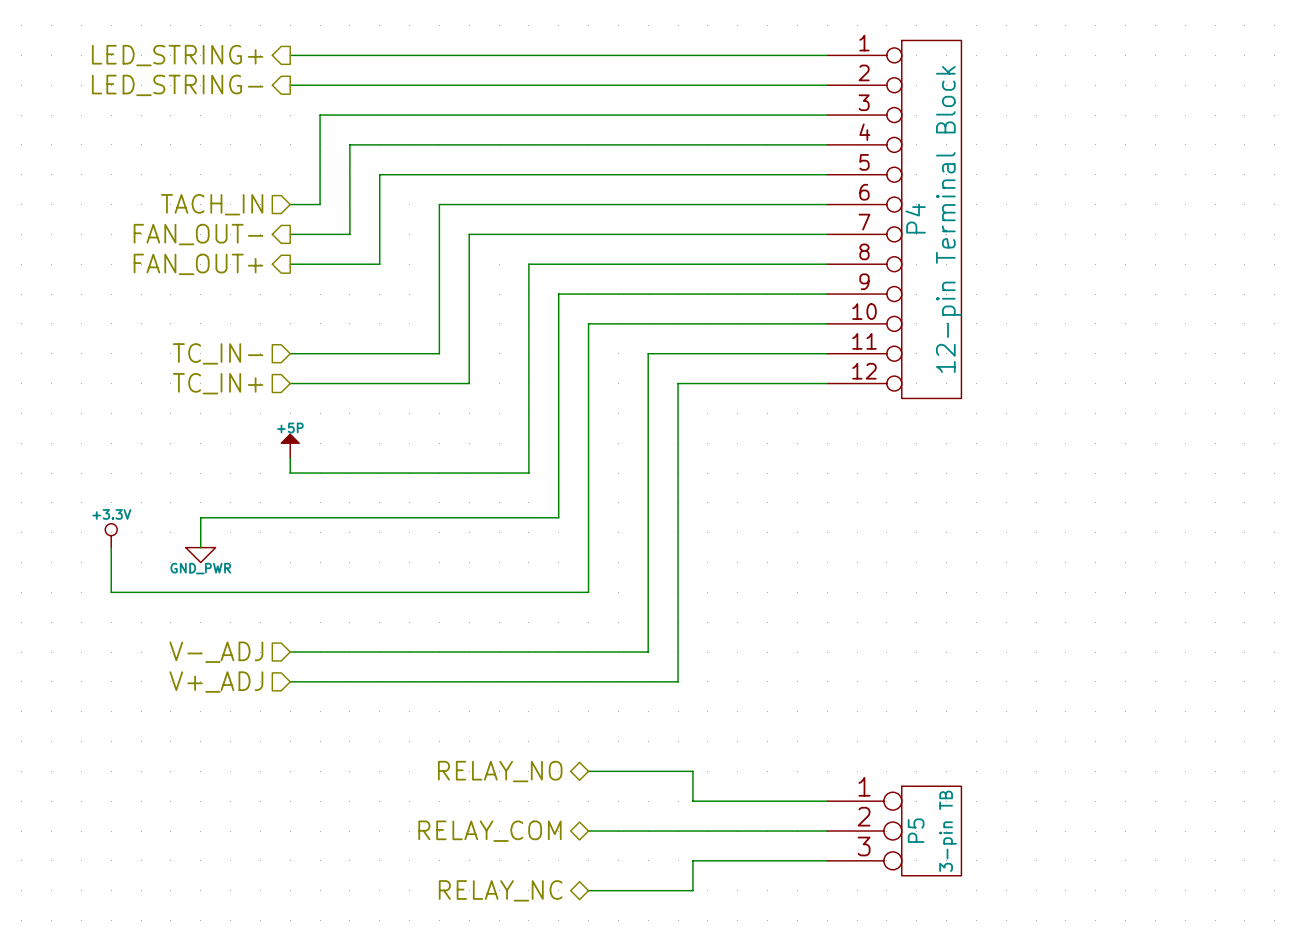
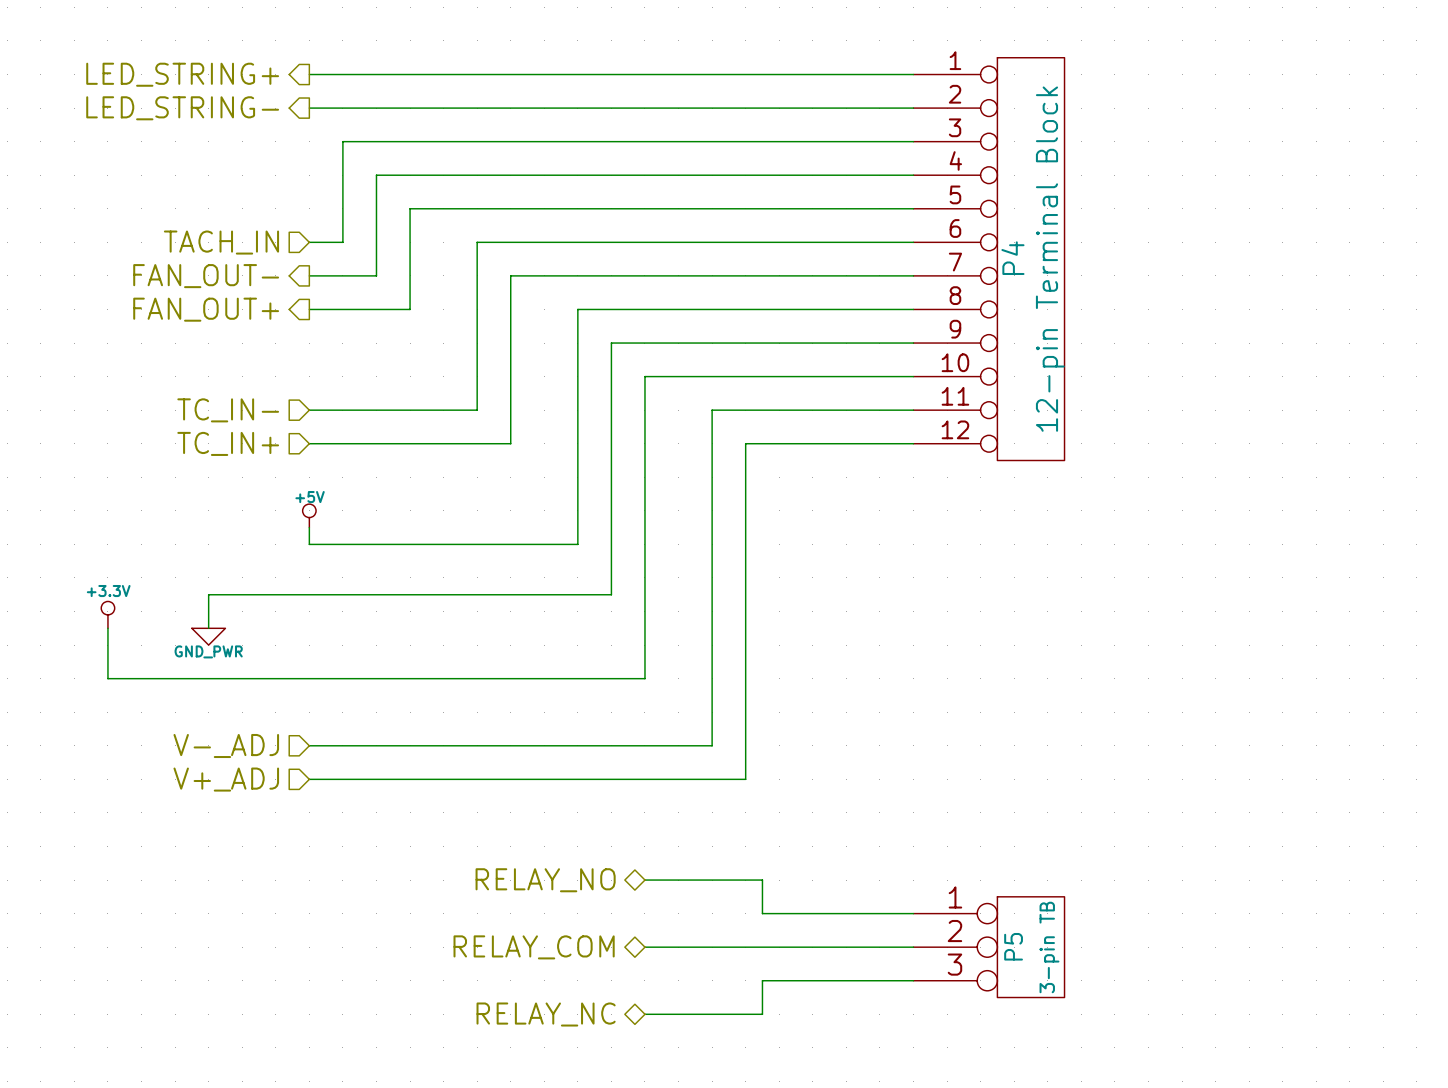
power symbol: +5P (290, 446) -> +5V (309, 515)

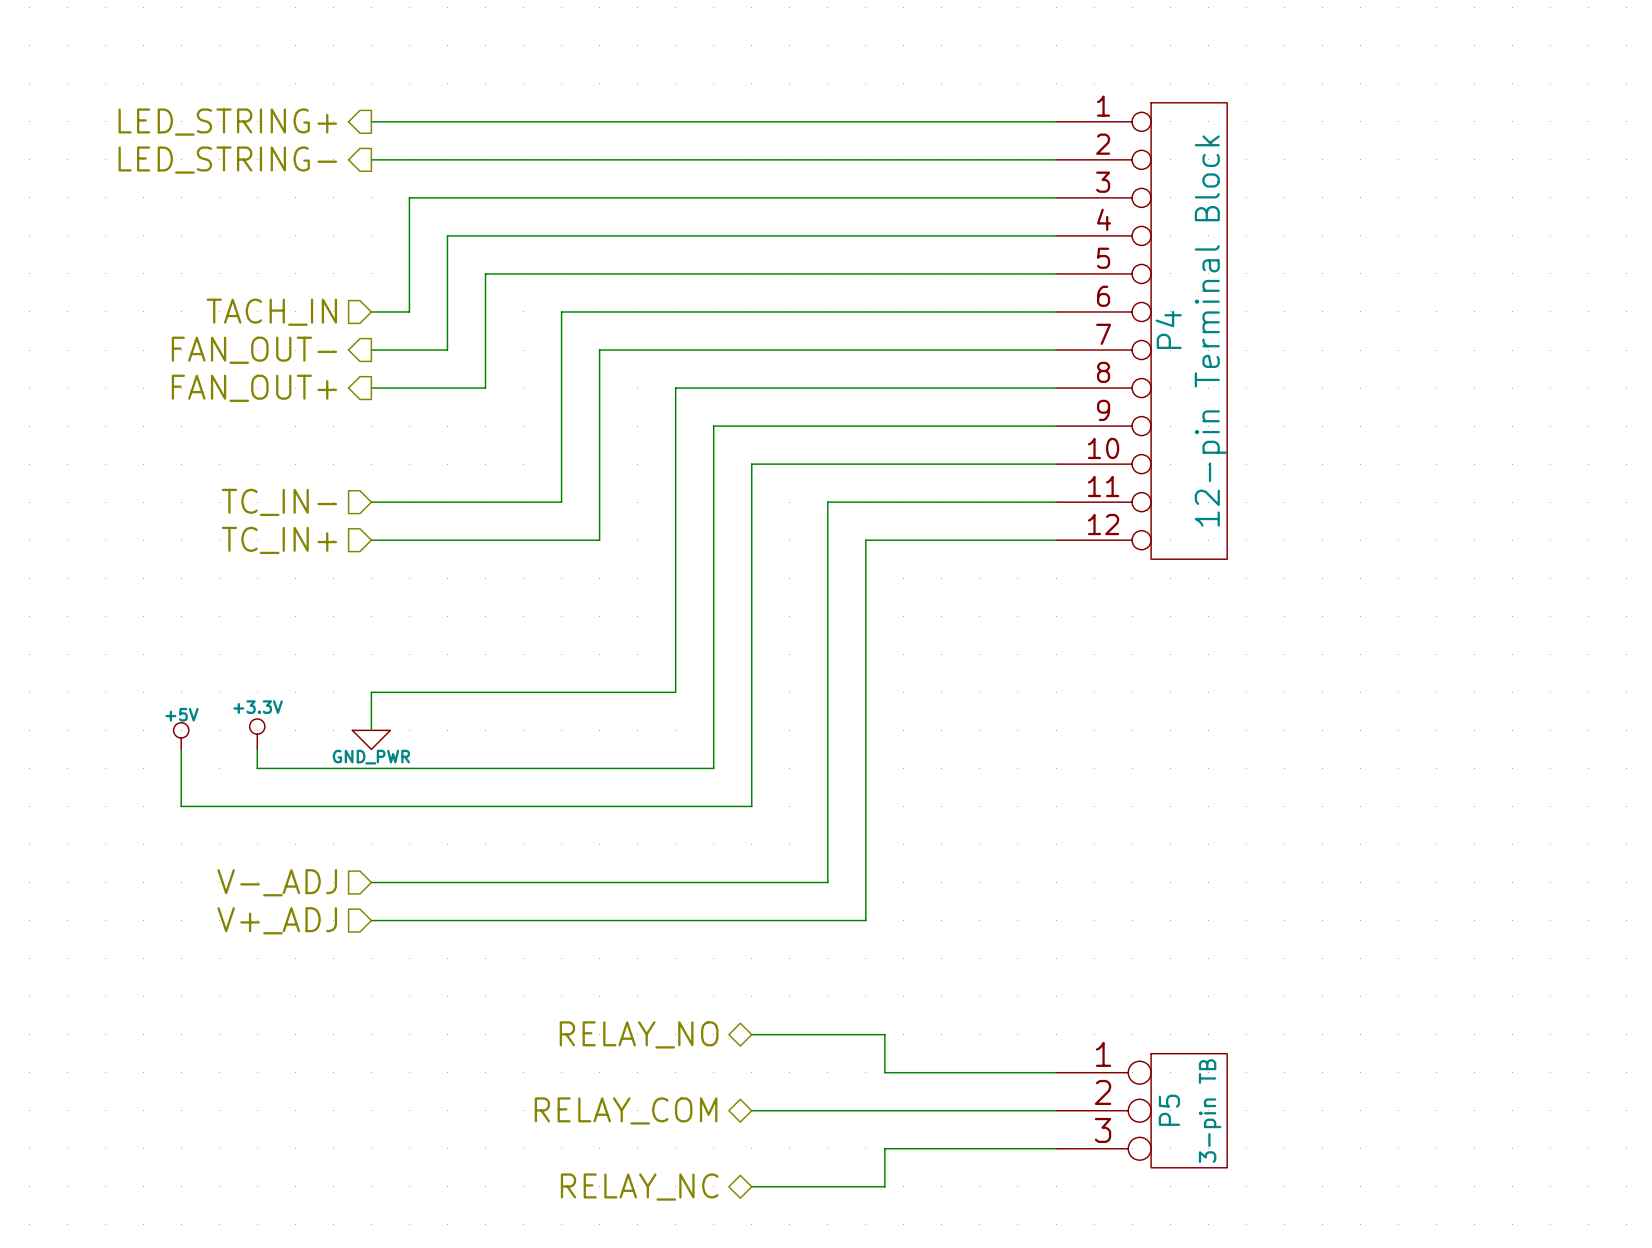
power symbol position: +5V (309, 515) -> +5V (181, 736)
wire: (309, 527) (309, 544) (577, 544) -> (371, 730) (371, 692) (675, 692) (675, 654)
wire: (611, 594) (208, 594) (208, 628) -> (713, 711) (713, 768) (257, 768) (257, 749)
power symbol position: +3.3V (107, 614) -> +3.3V (257, 734)
wire: (107, 628) (107, 678) (141, 678) -> (181, 749) (181, 806)
power symbol position: GND_PWR (208, 636) -> GND_PWR (371, 739)

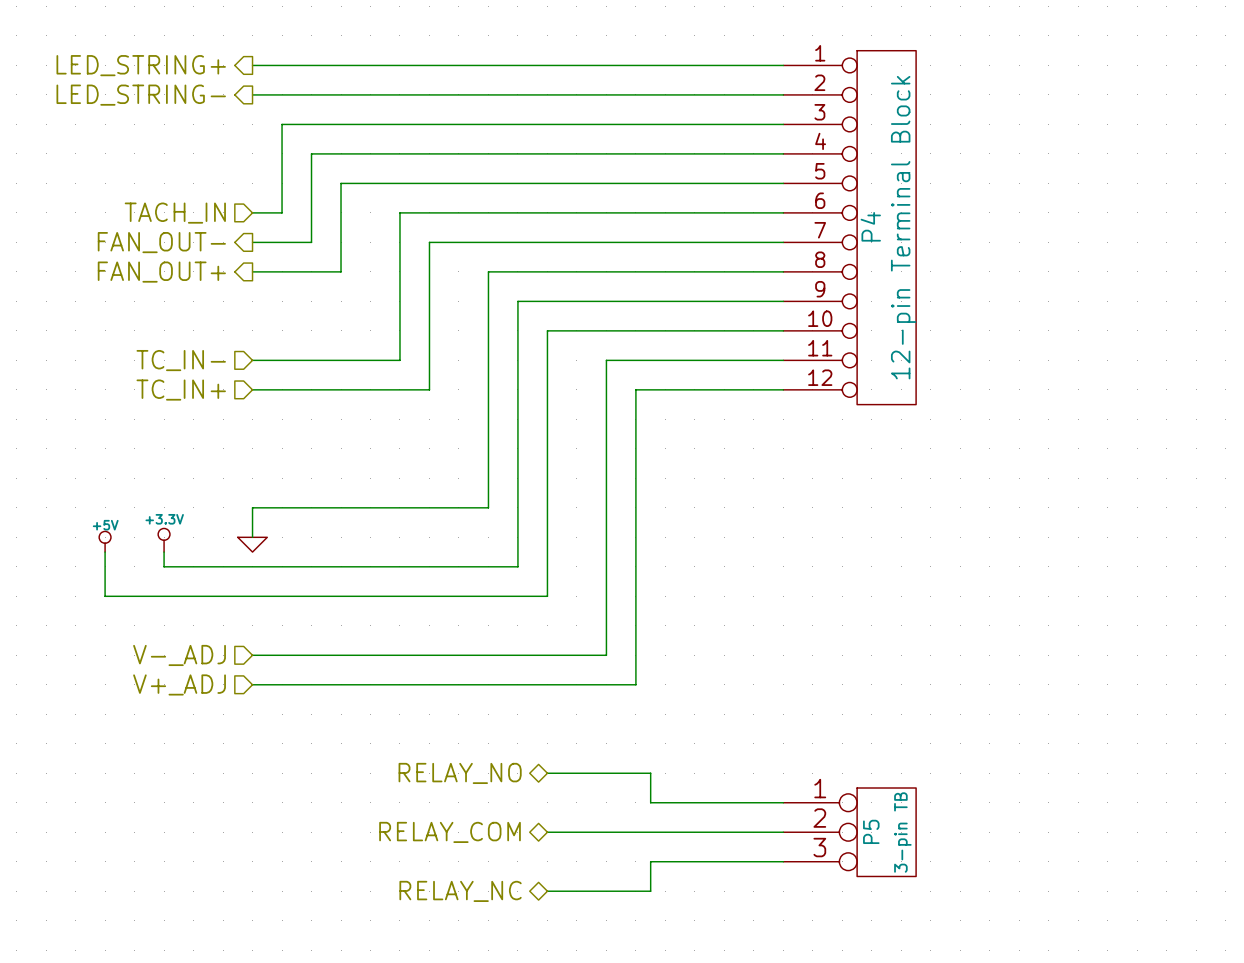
power symbol text: GND_PWR (371, 757) -> none

